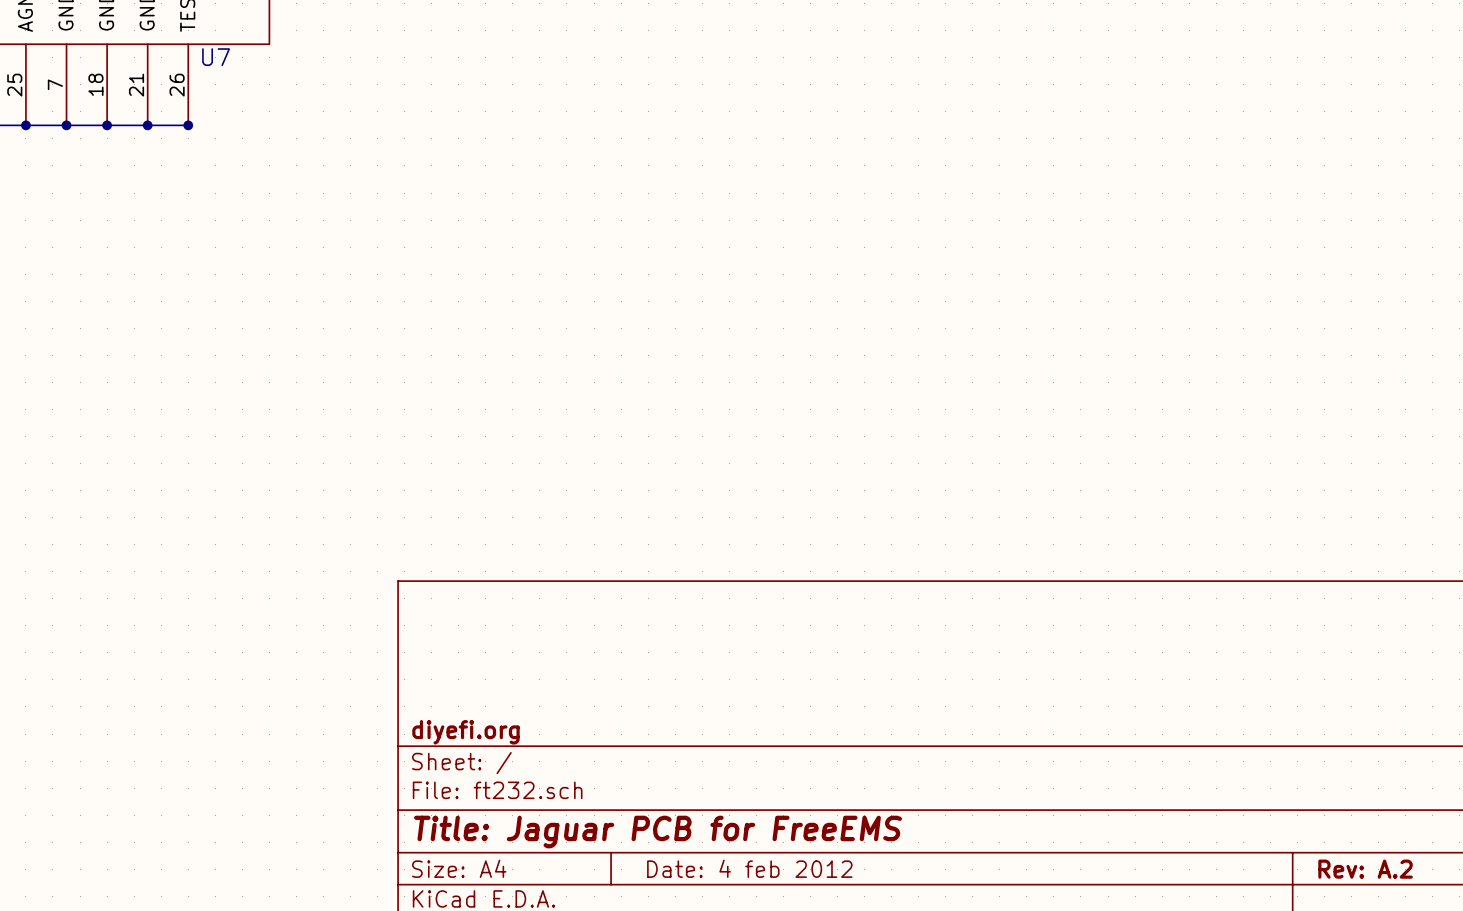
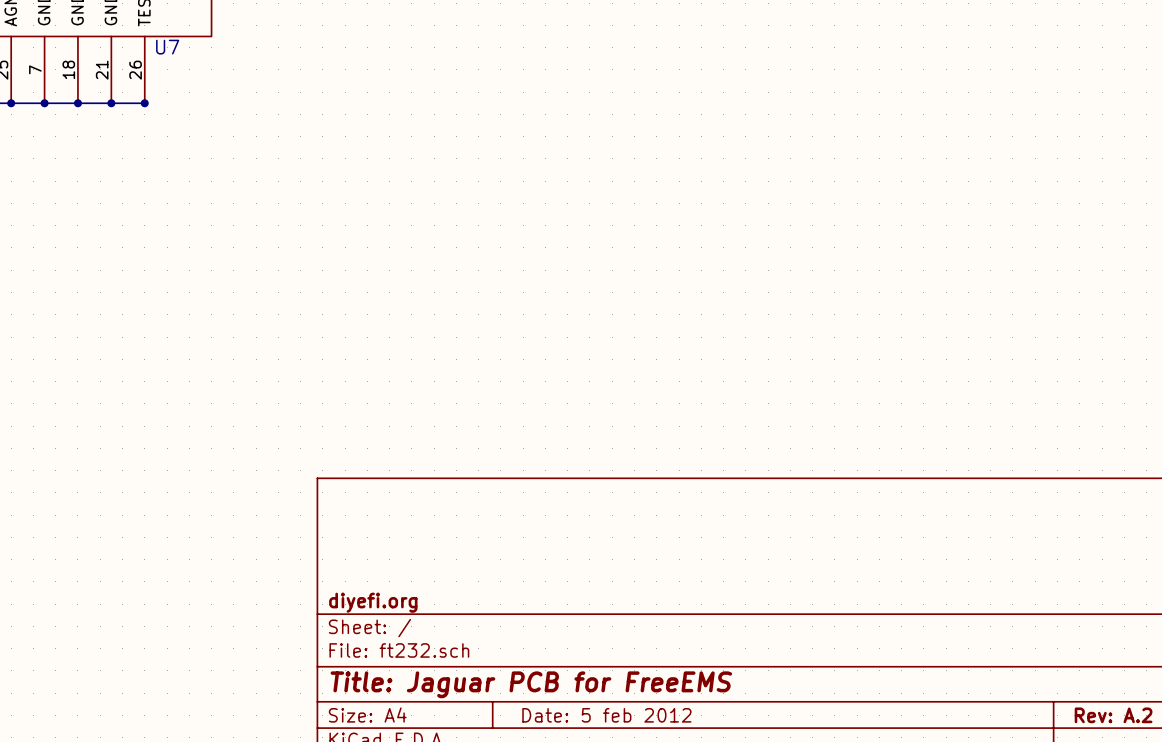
title block: Date: 4 feb 2012 (749, 868) -> Date: 5 feb 2012 (606, 715)

